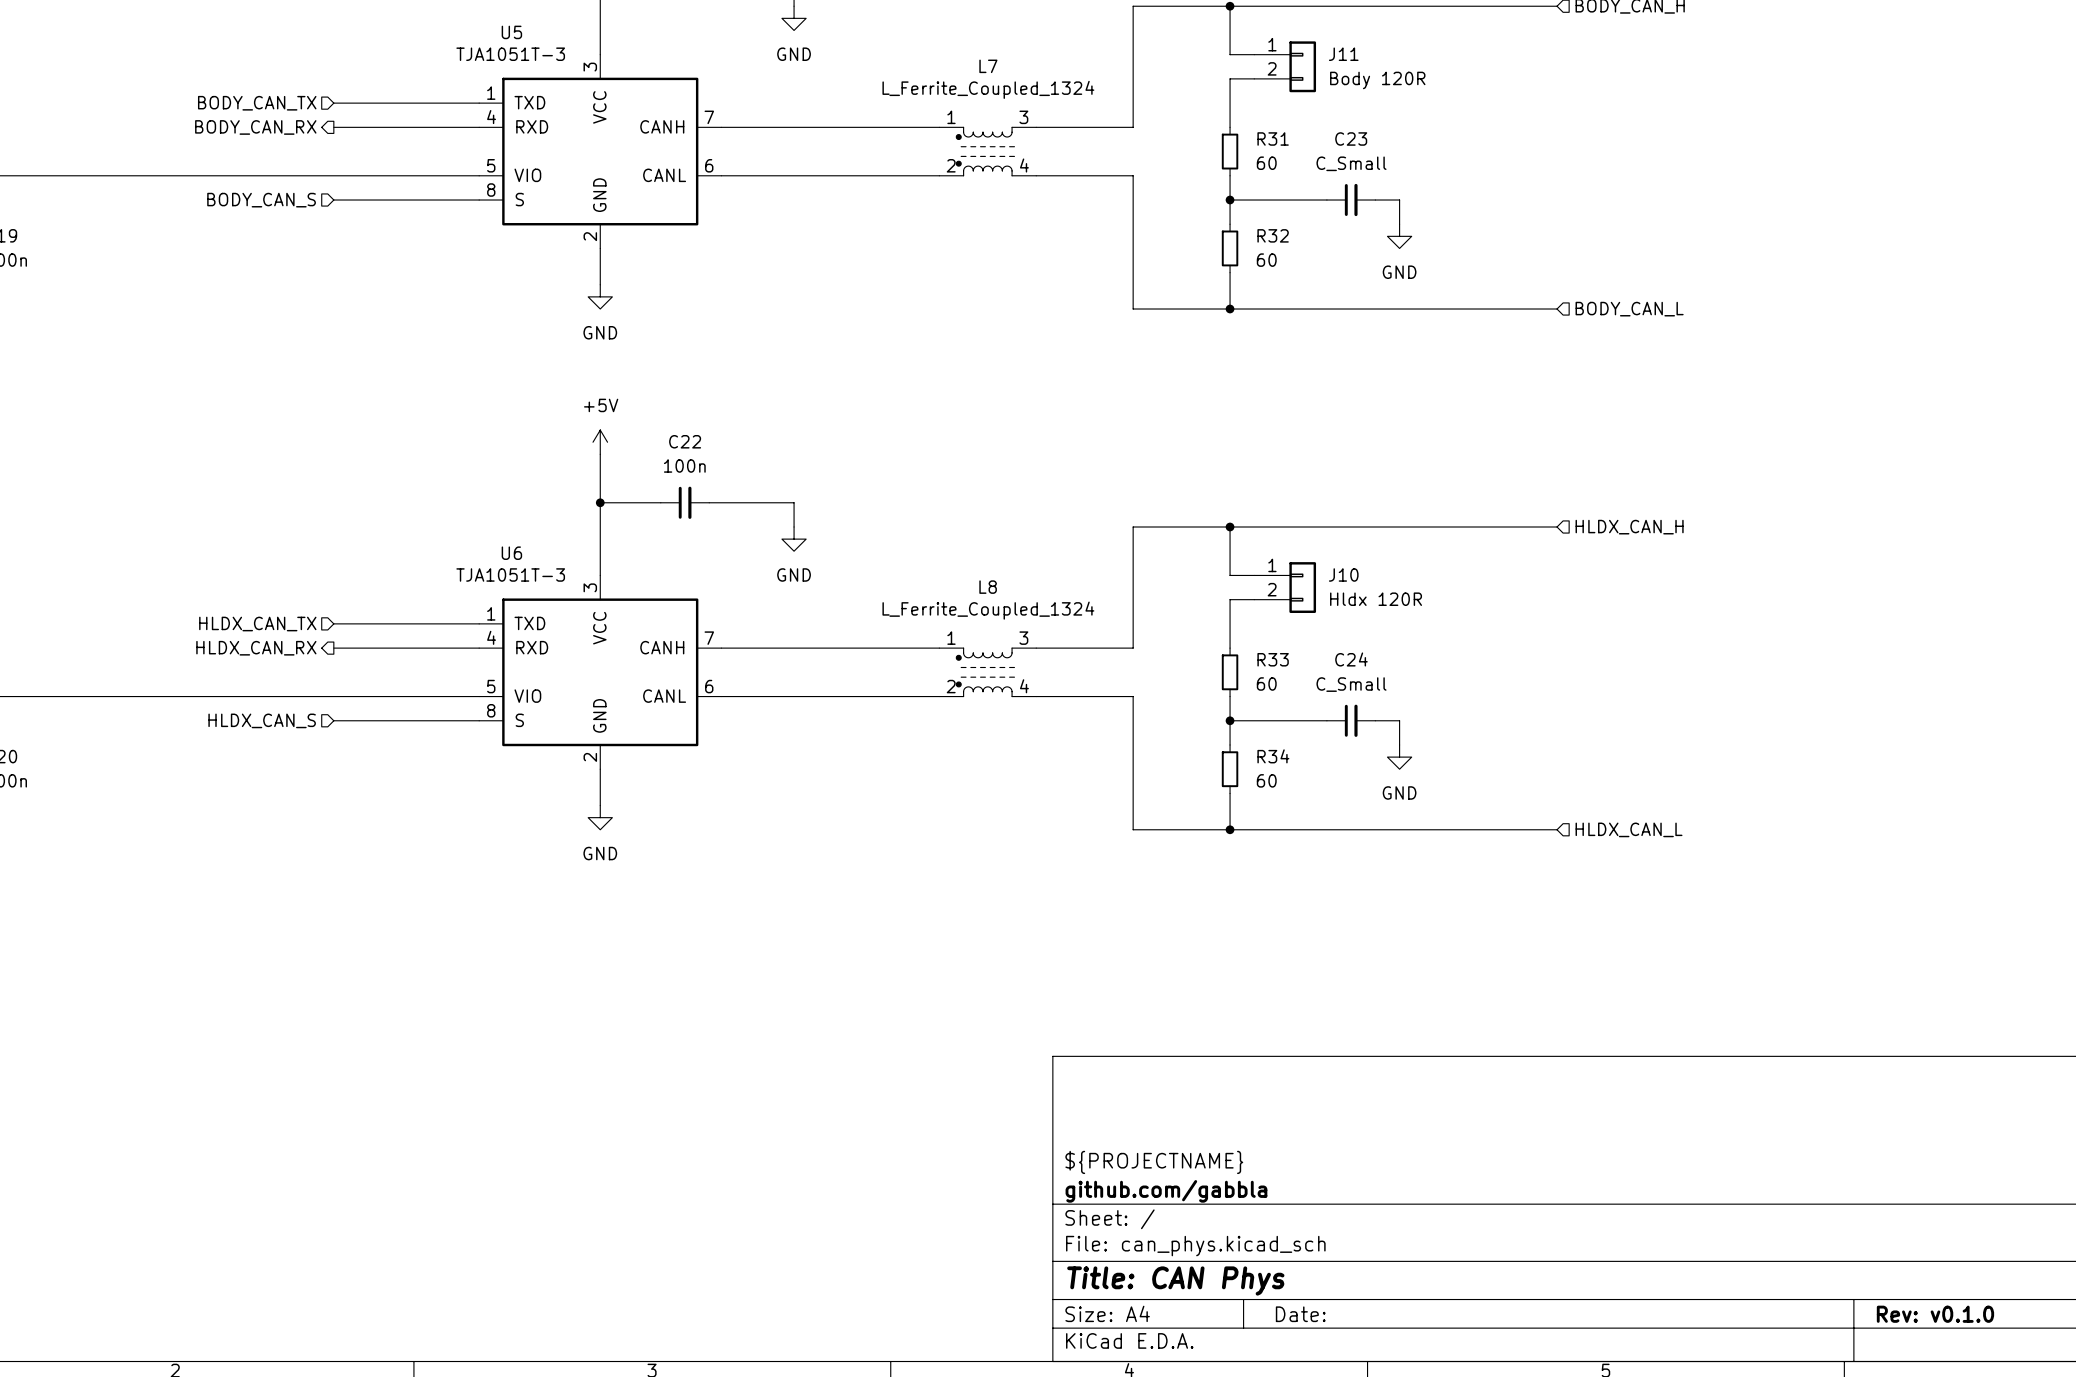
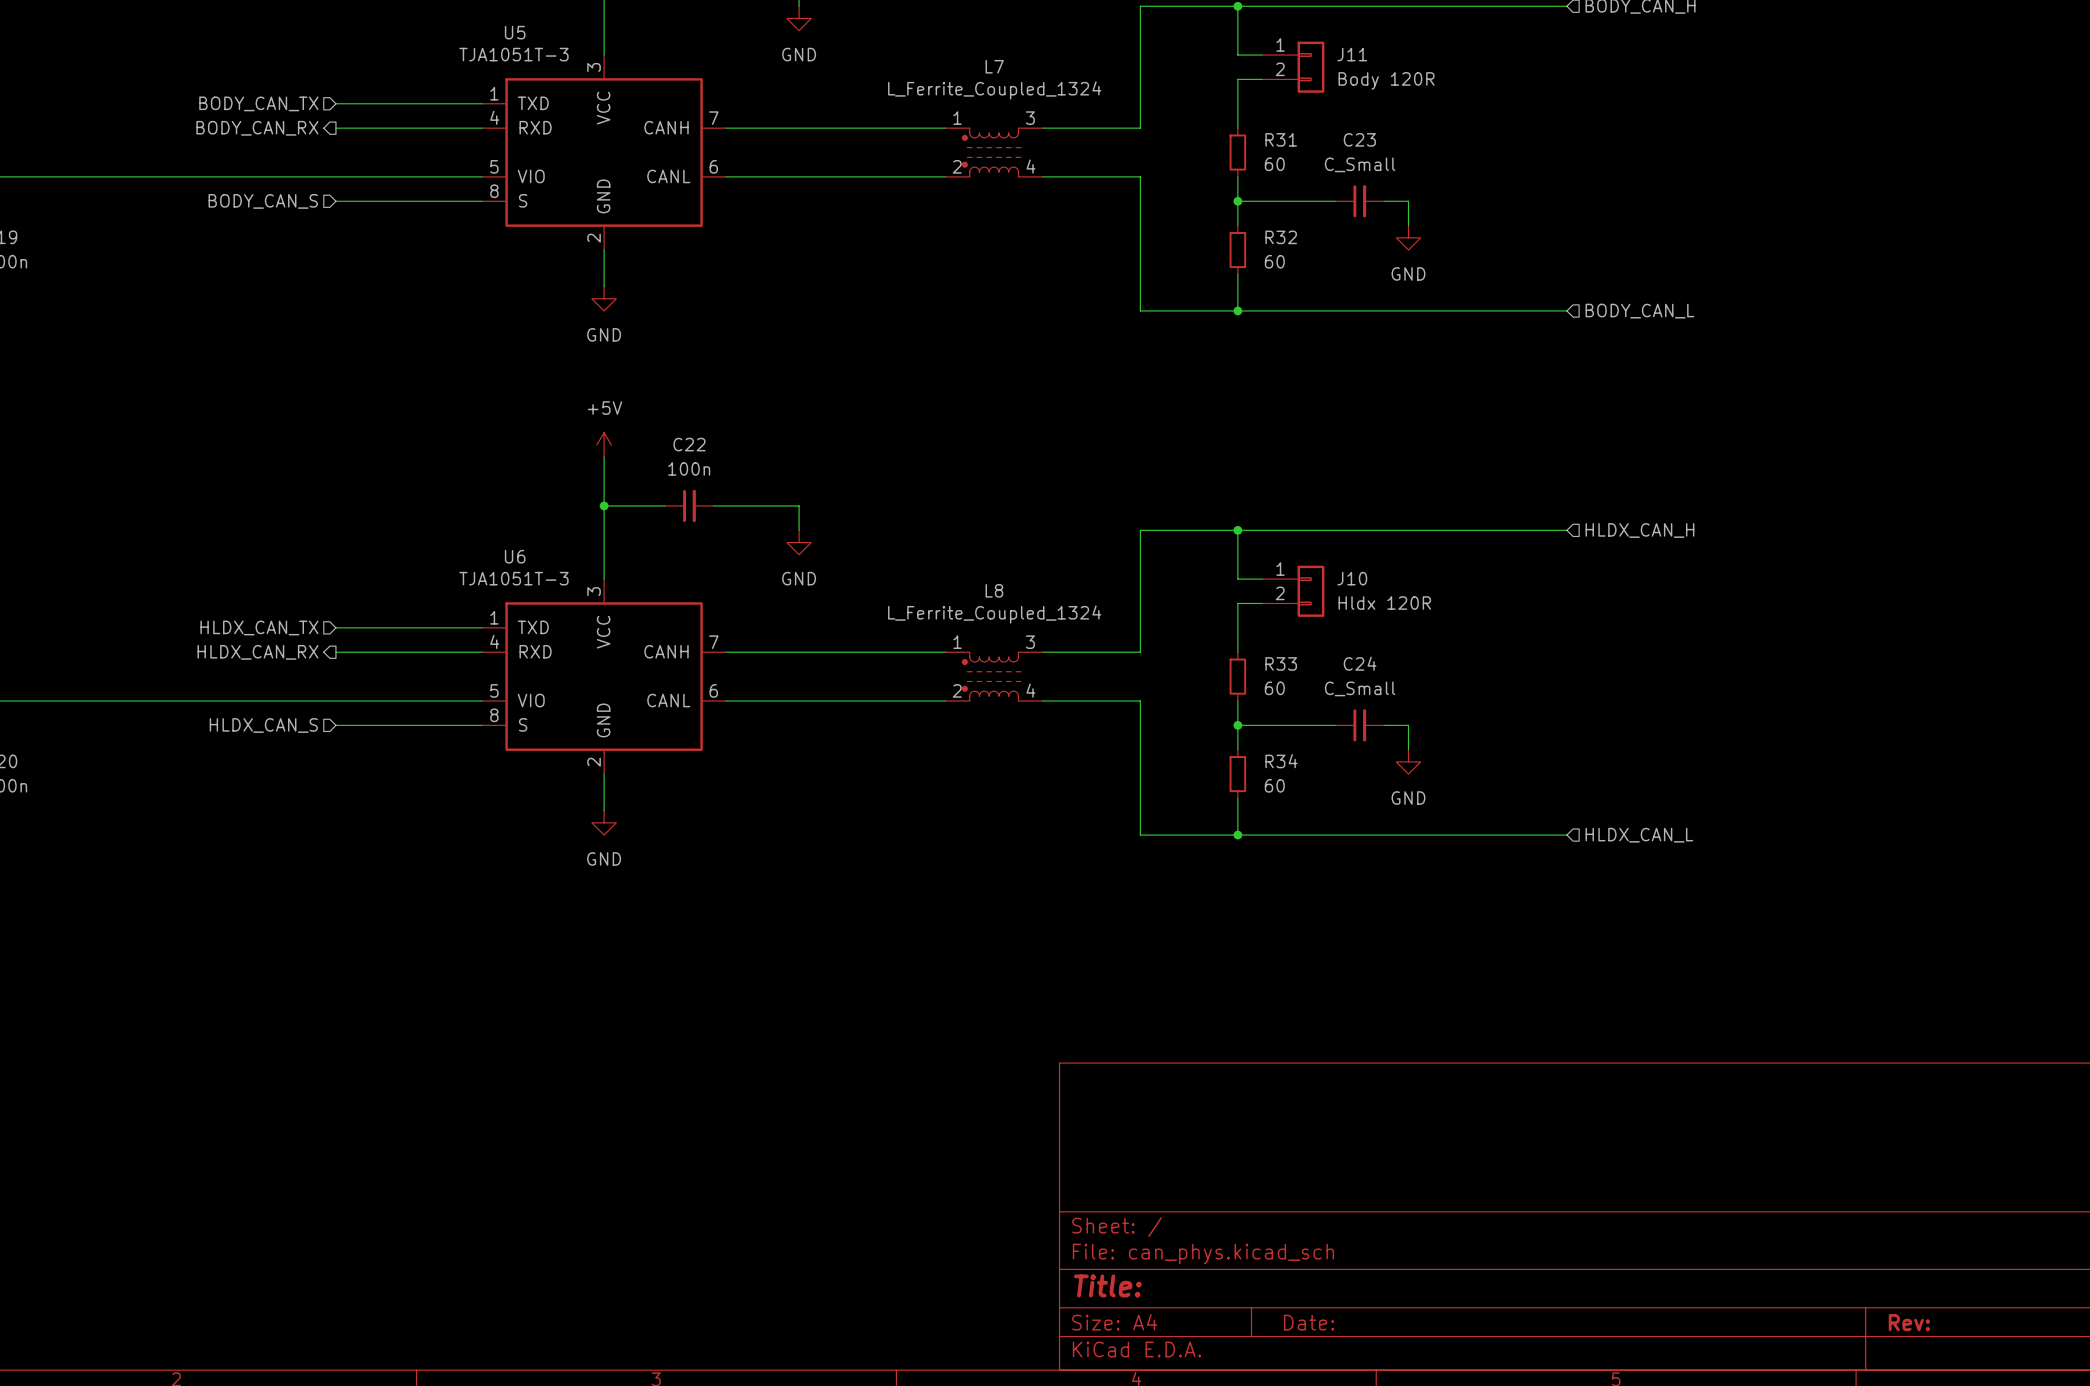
title block: ${PROJECTNAME} (1154, 1162) -> none
title block: github.com/gabbla (1166, 1191) -> none
title block: Title: CAN Phys (1175, 1281) -> Title: (1107, 1285)
title block: Rev: v0.1.0 (1935, 1314) -> Rev: (1909, 1322)

